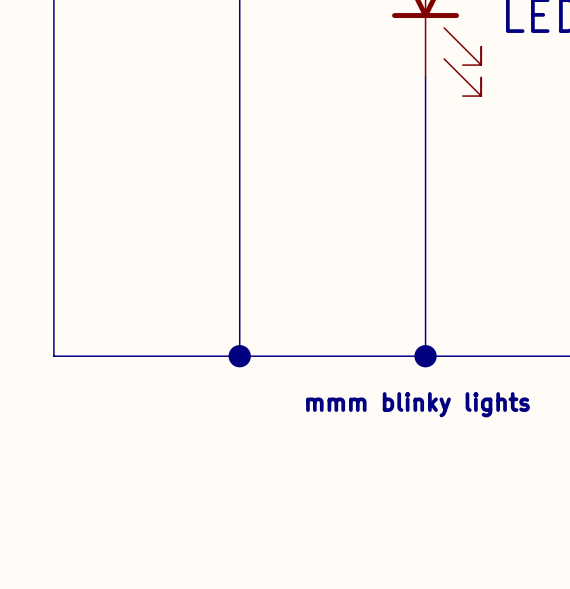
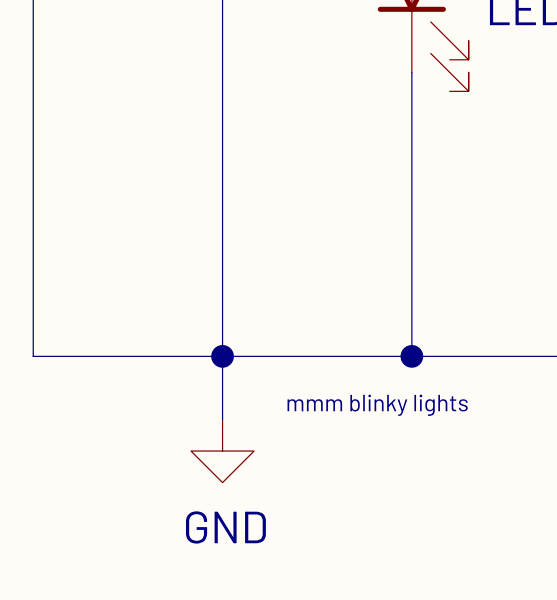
wire: none -> (222, 356) (222, 419)
power symbol: none -> GND (222, 451)

